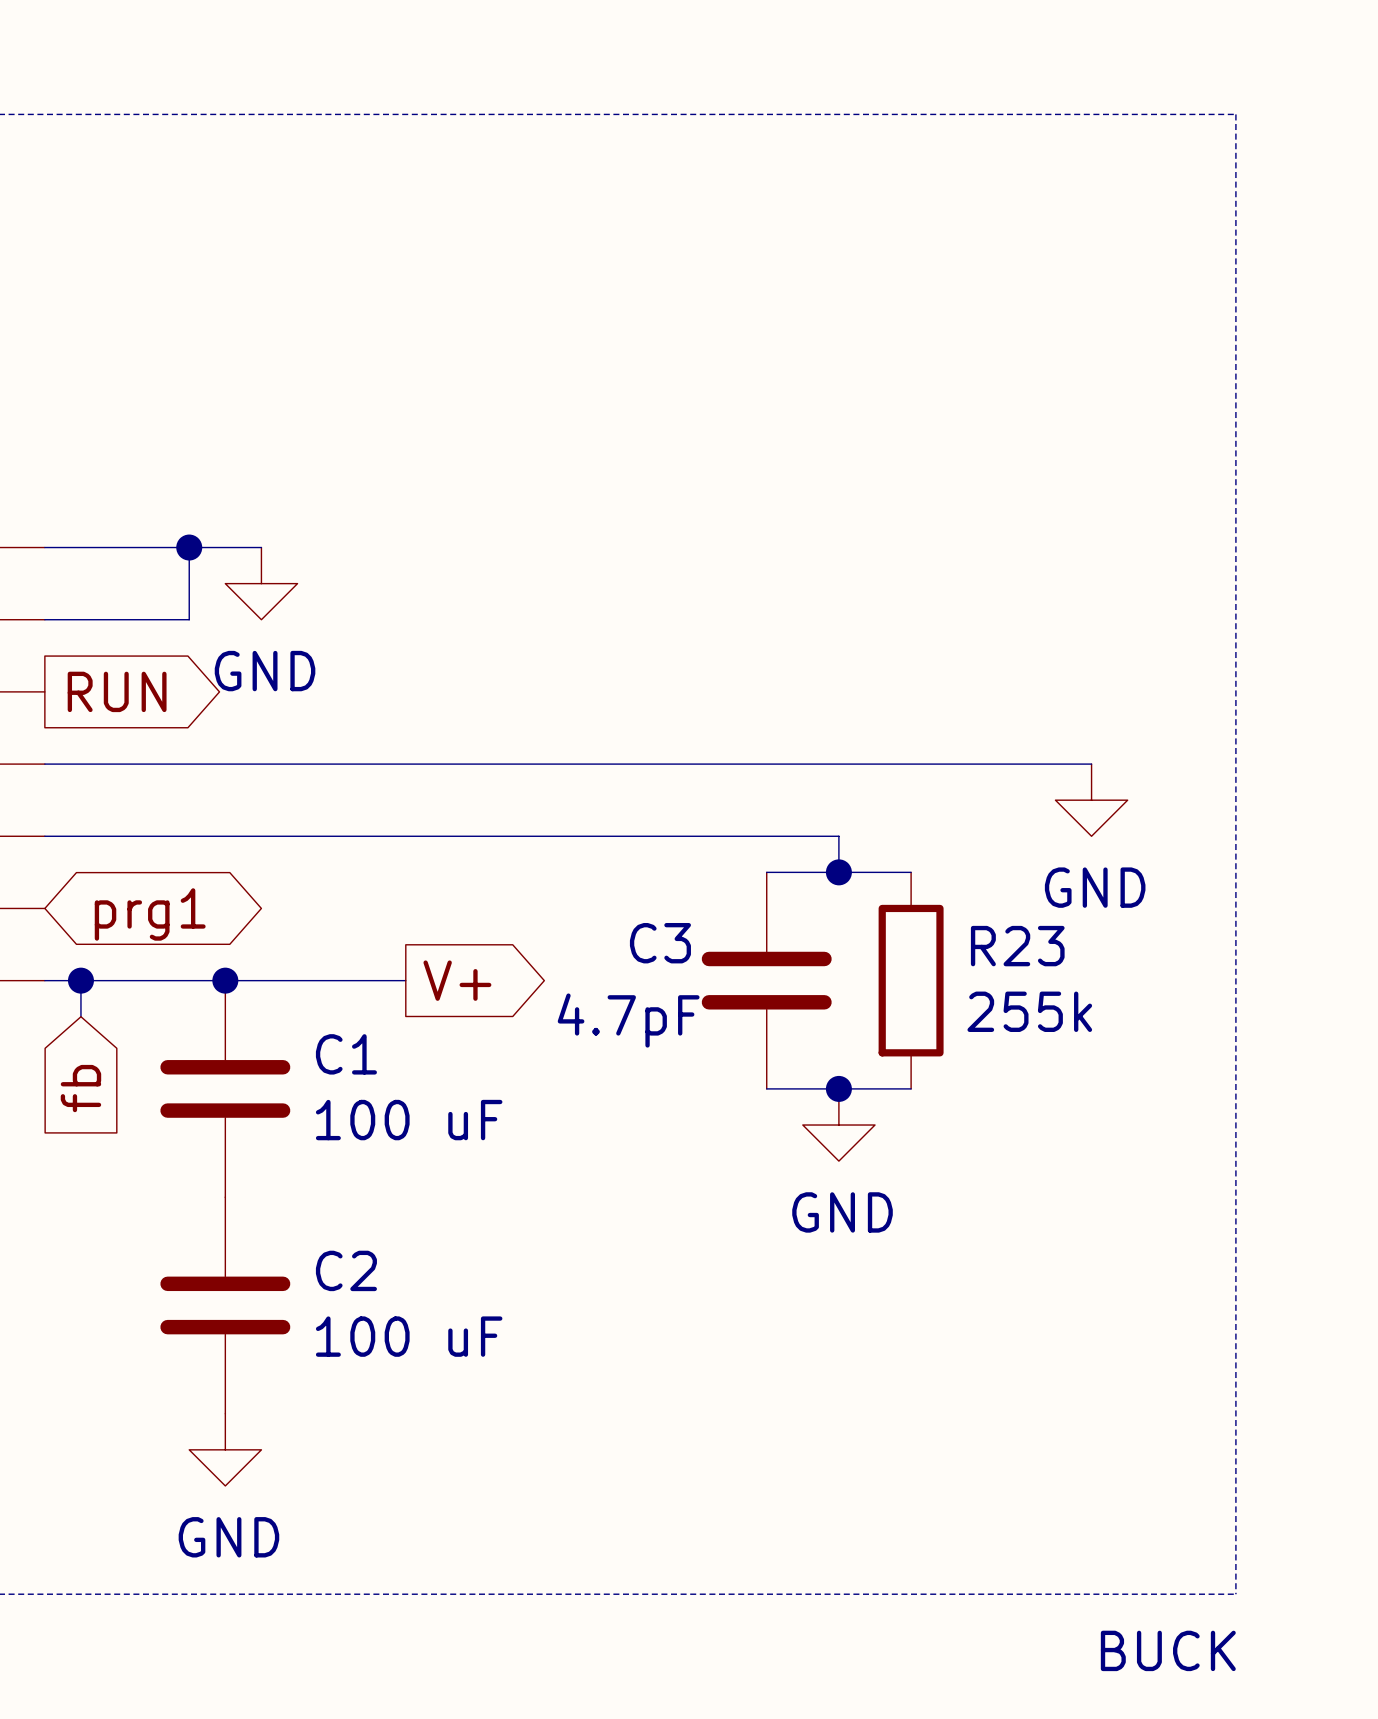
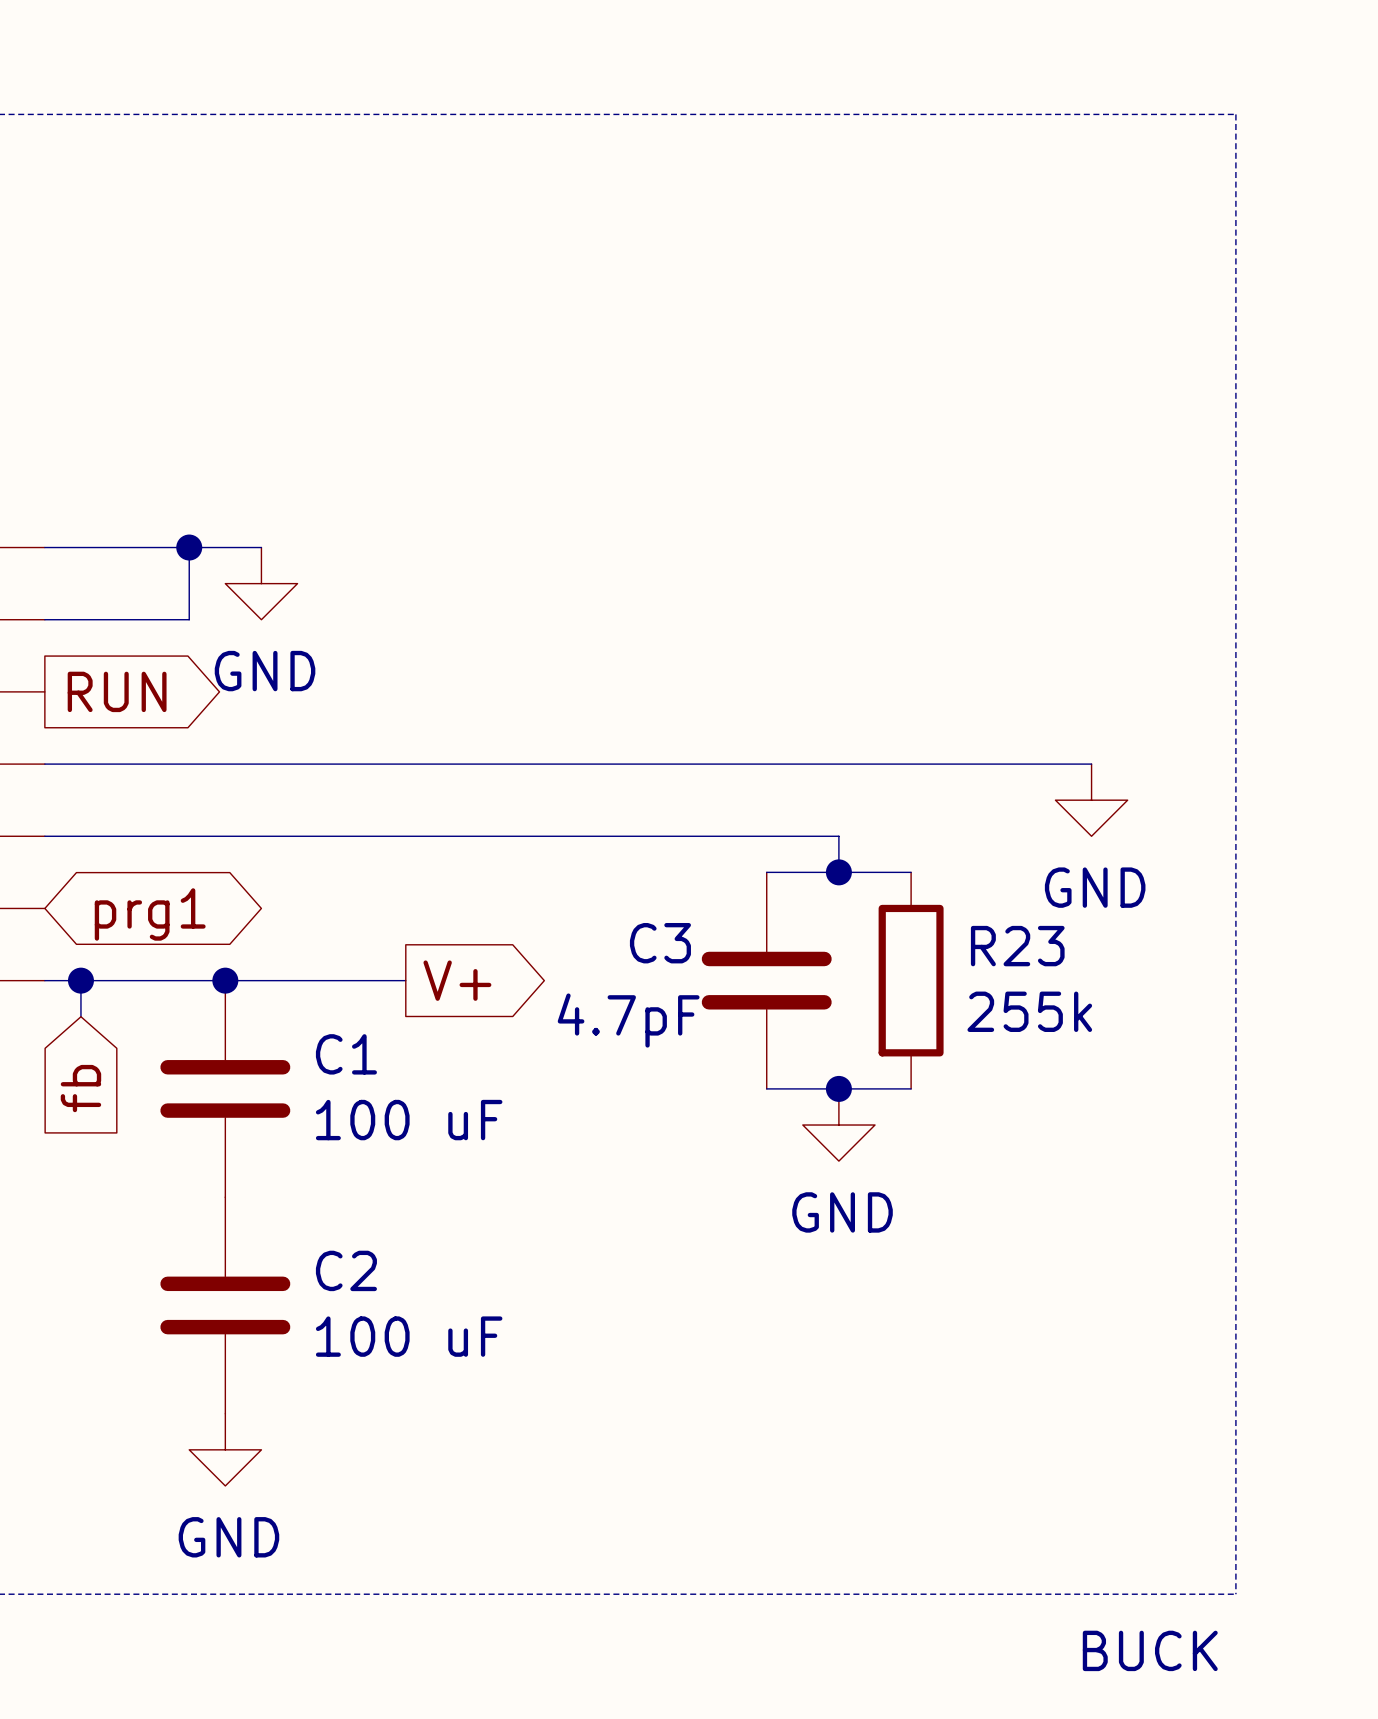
text position: BUCK (1168, 1650) -> BUCK (1150, 1650)

